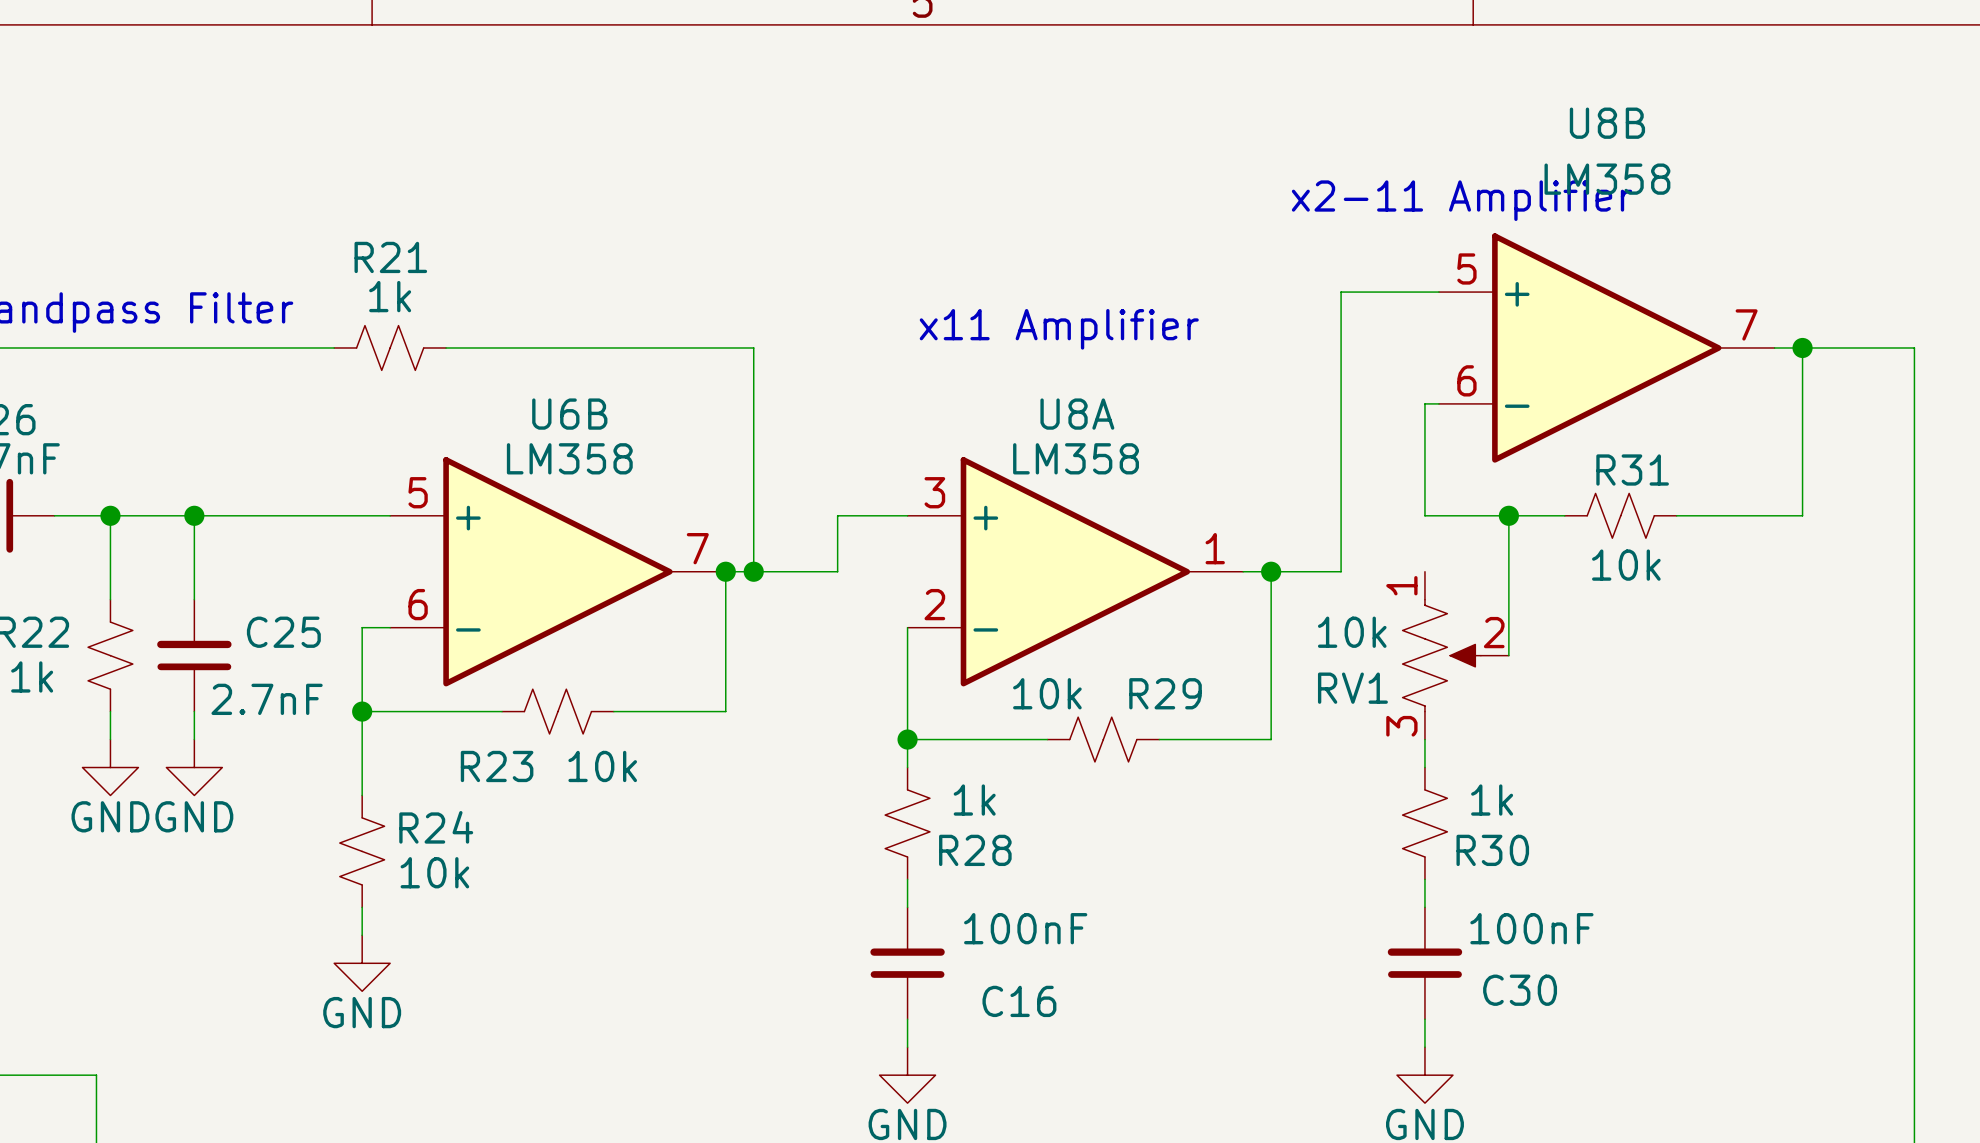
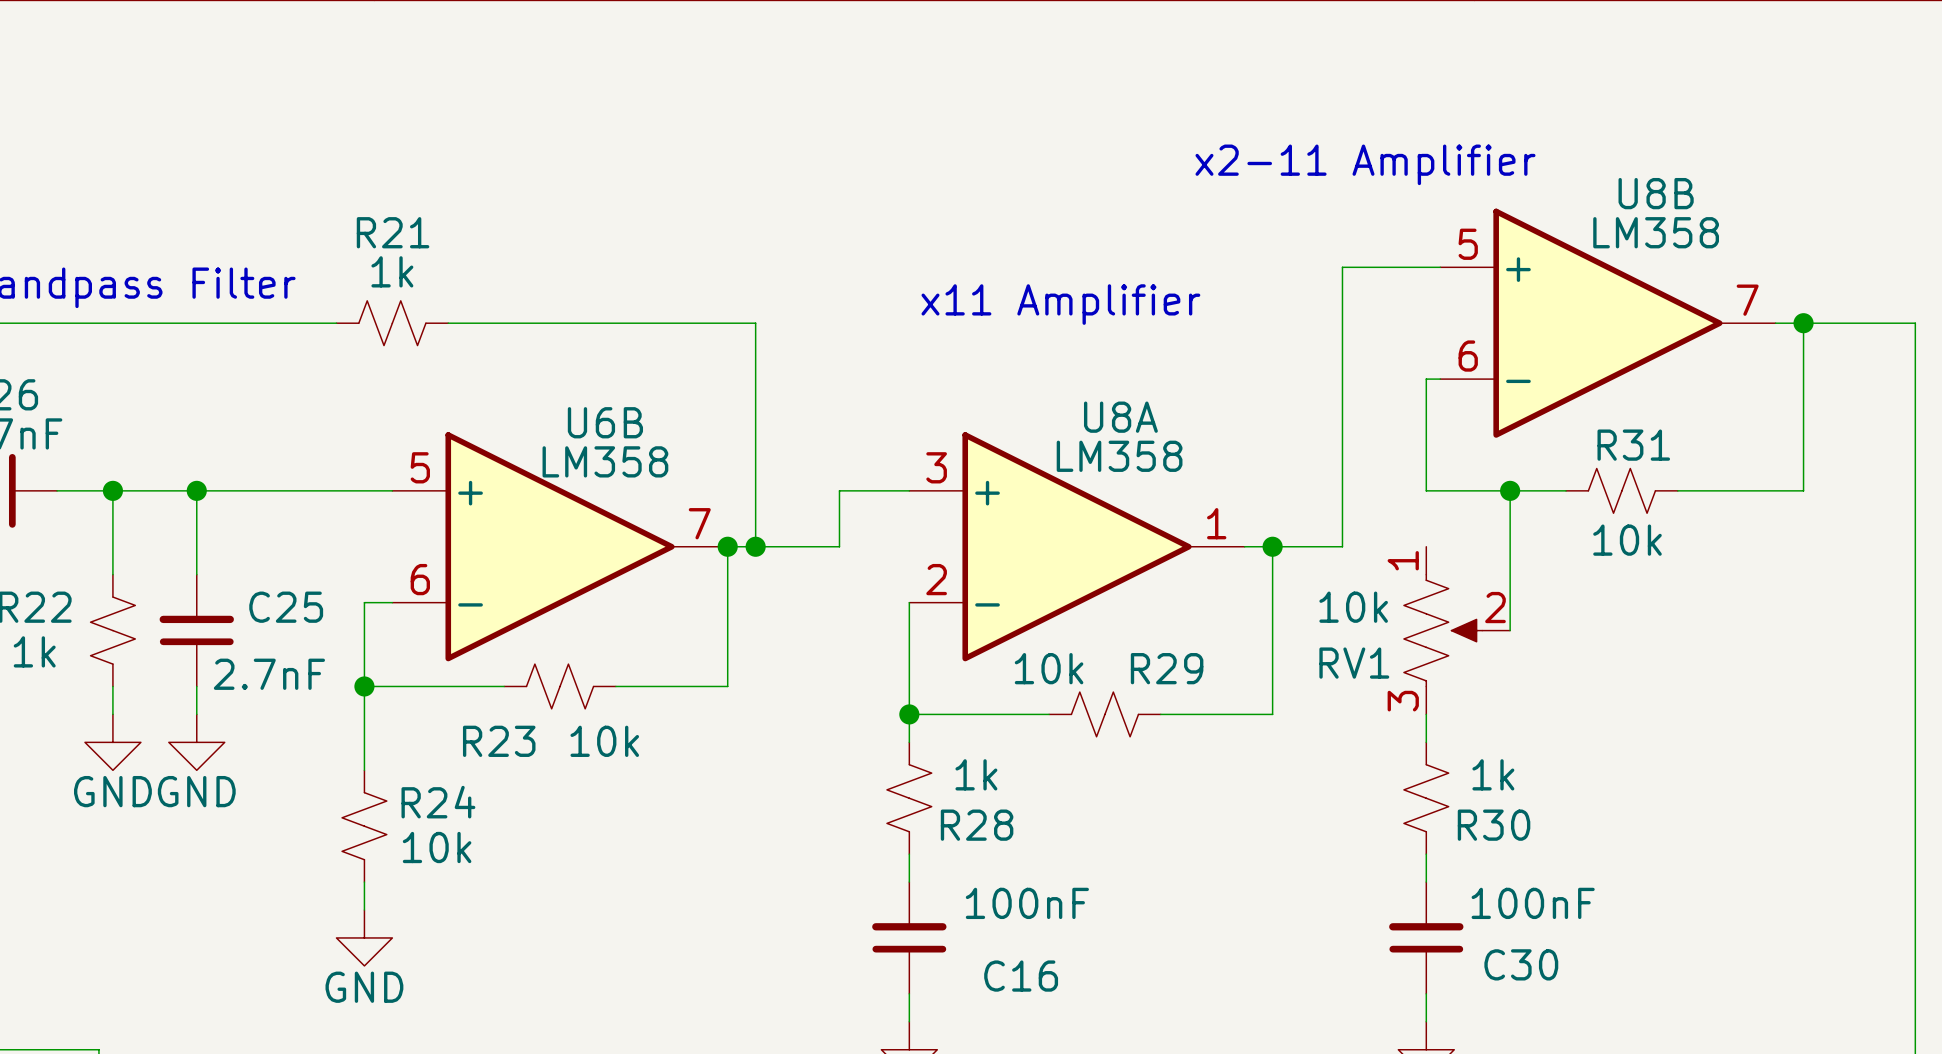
U8B name position: U8B (1607, 123) -> U8B (1656, 193)
U8B value position: LM358 (1607, 179) -> LM358 (1656, 232)
text position: x2-11 Amplifier (1462, 200) -> x2-11 Amplifier (1365, 164)
U6B name position: U6B (569, 414) -> U6B (605, 422)
U8A name position: U8A (1077, 414) -> U8A (1120, 417)
U6B value position: LM358 (569, 458) -> LM358 (605, 461)
U8A value position: LM358 (1076, 458) -> LM358 (1119, 456)

